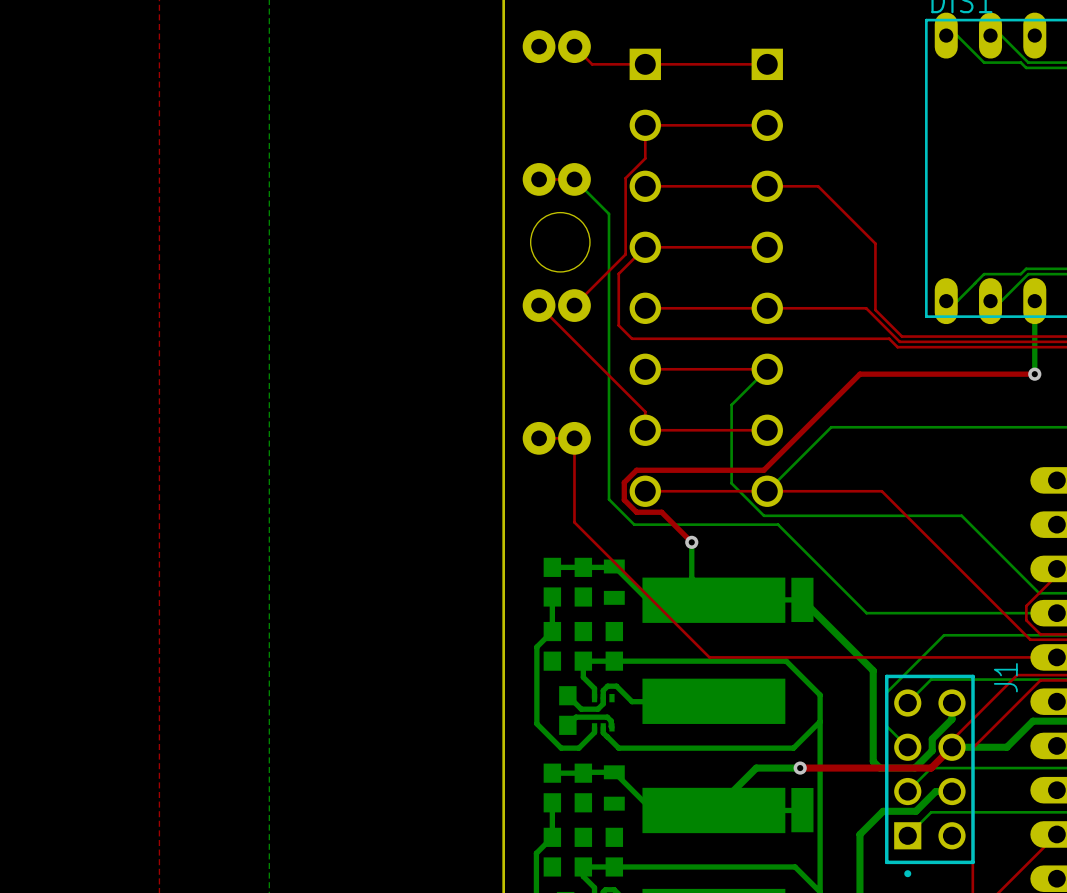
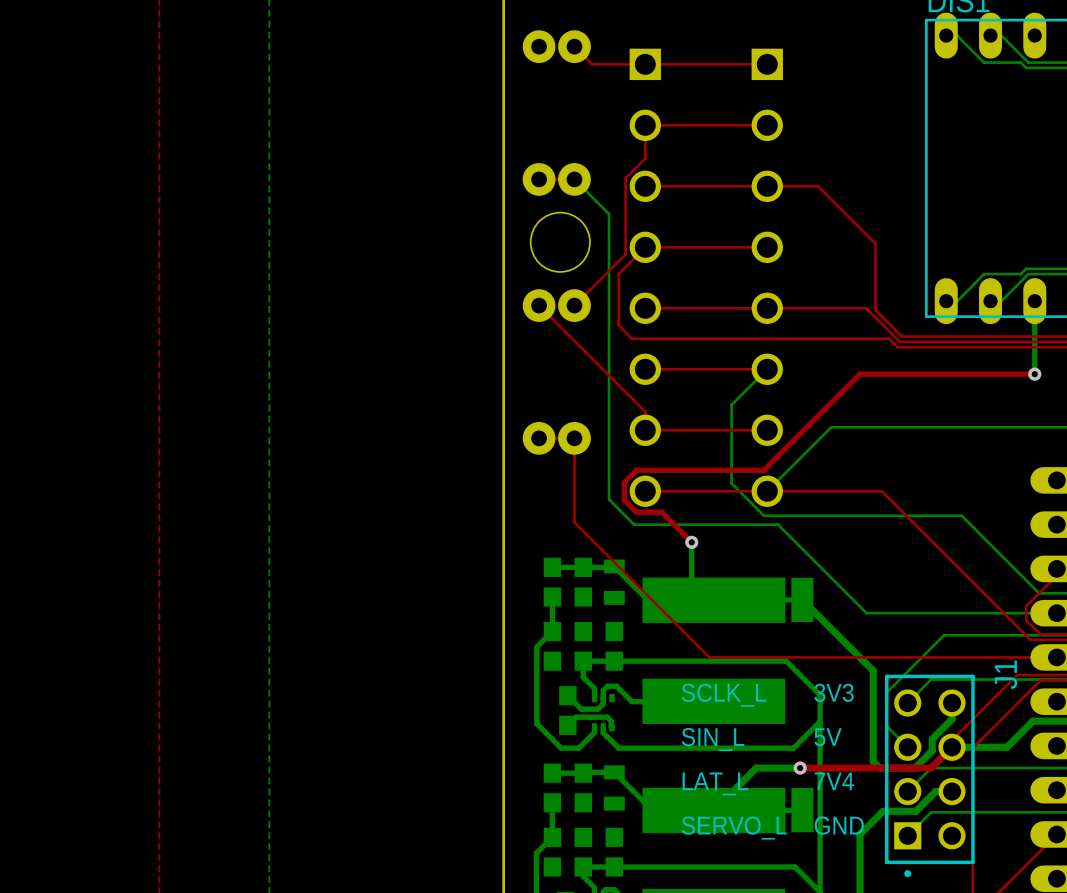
text: none -> 3V3 (834, 692)
text: none -> SCLK_L (723, 695)
text: none -> SIN_L (713, 739)
text: none -> 5V (828, 737)
text: none -> 7V4 (834, 781)
text: none -> LAT_L (715, 783)
text: none -> GND (839, 825)
text: none -> SERVO_L (734, 828)

